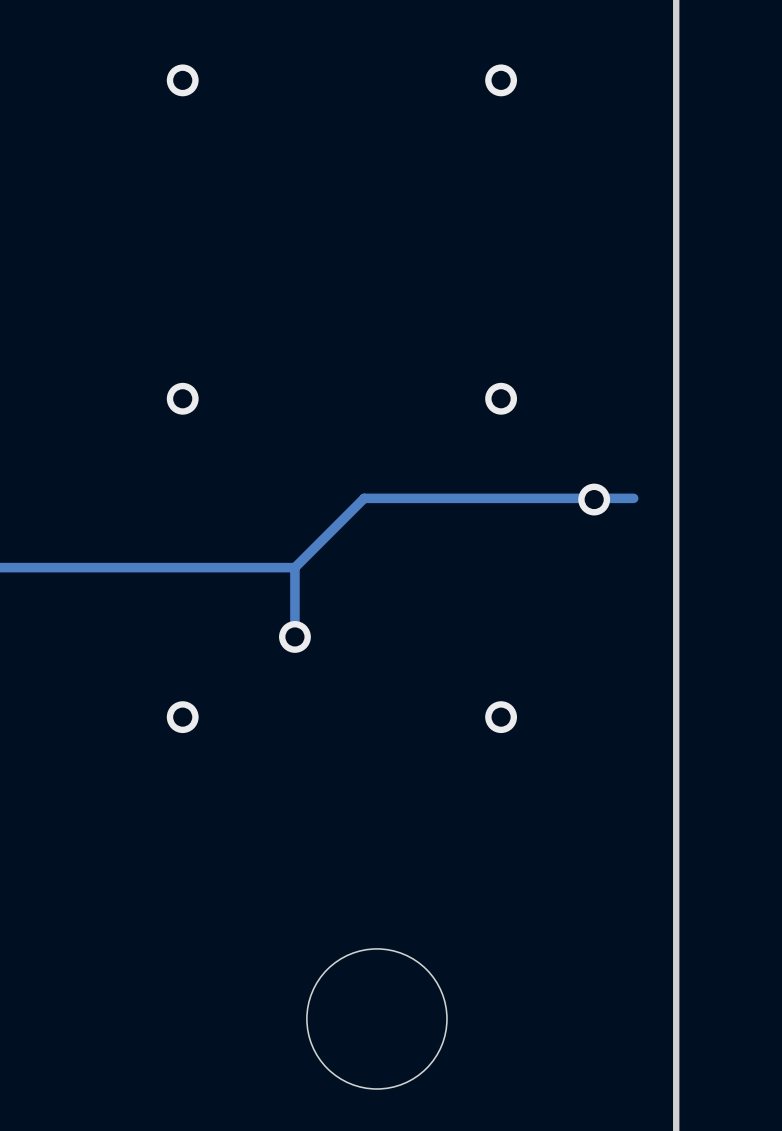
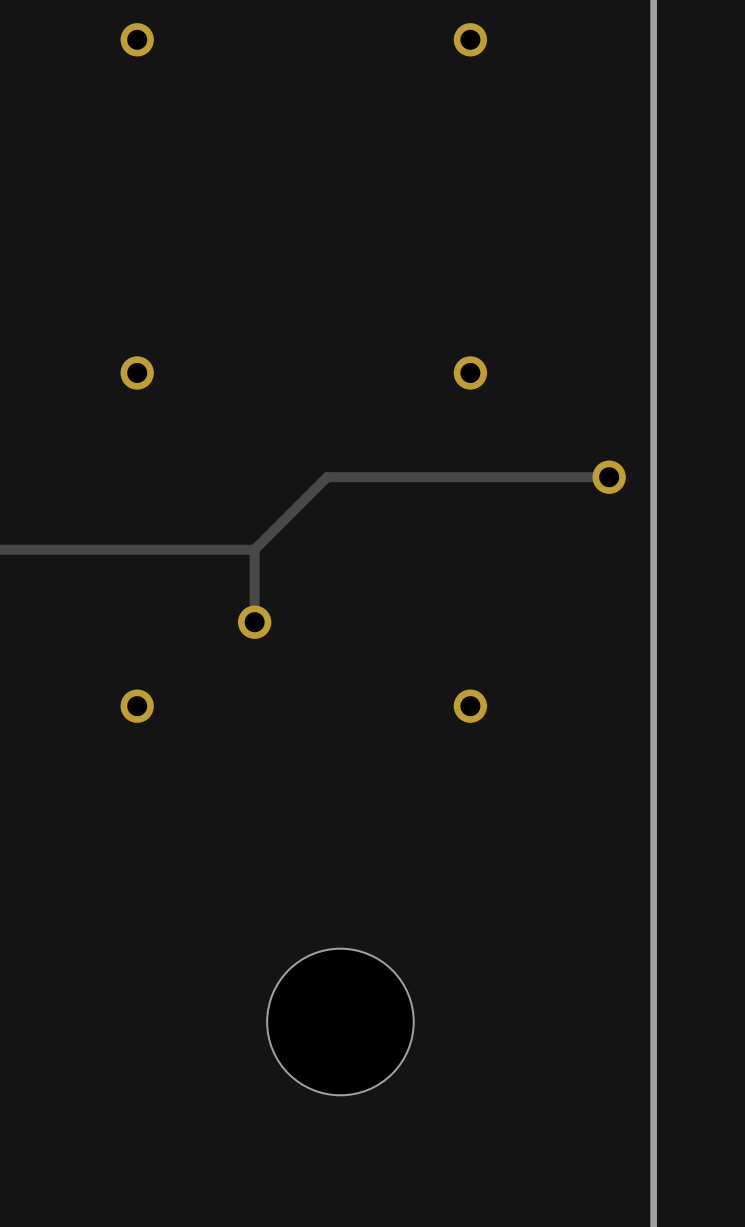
via position: (594, 499) -> (609, 477)

